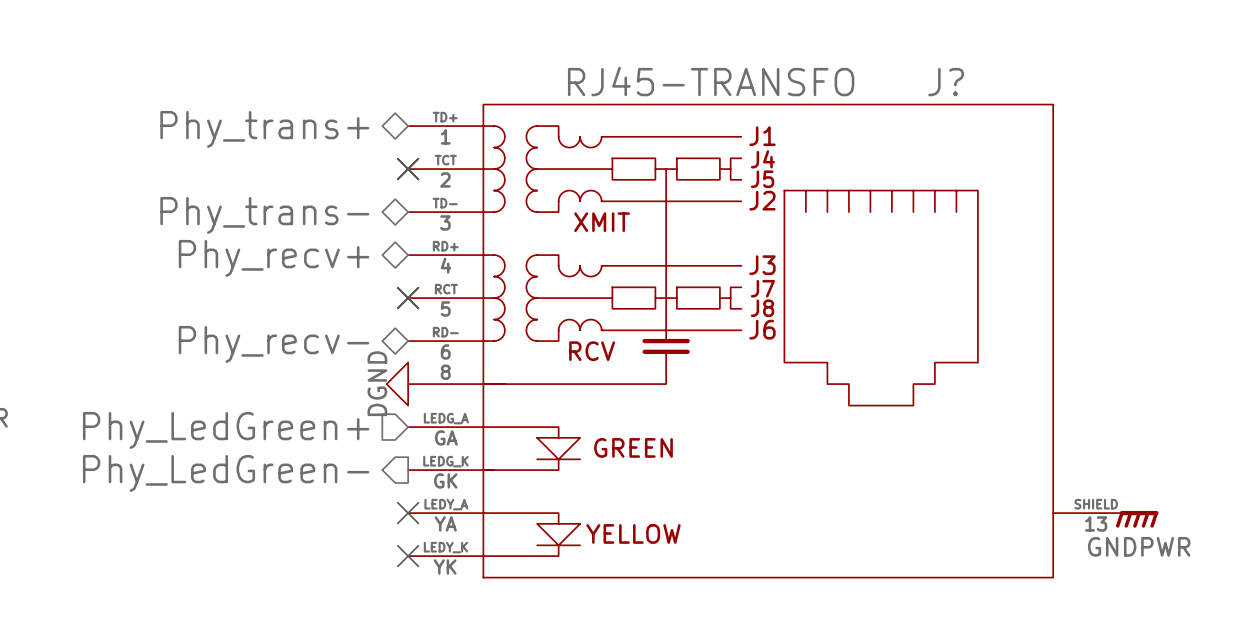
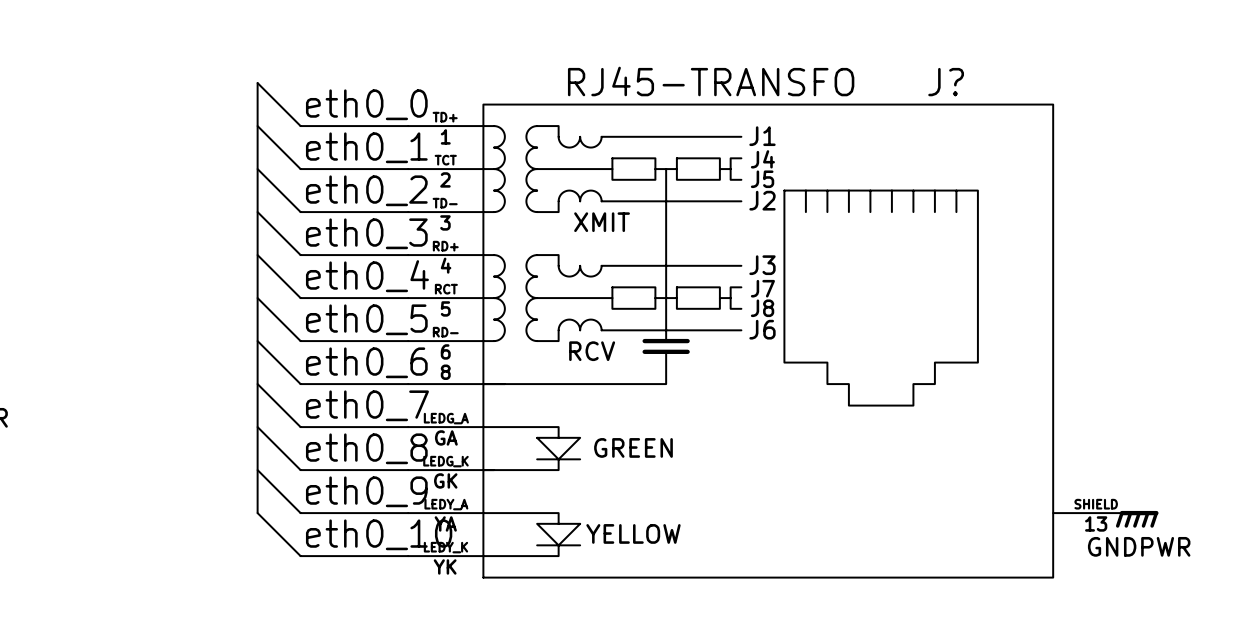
bus: none -> (257, 83) (257, 513)
wire: none -> (257, 83) (300, 126) (408, 126)
label: none -> eth0_0 (366, 104)
wire: none -> (257, 126) (300, 169) (408, 169)
hierarchical label: Phy_trans+ (264, 129) -> none
label: none -> eth0_1 (366, 147)
wire: none -> (257, 169) (300, 212) (408, 212)
no-connect mark: (408, 169) -> none
label: none -> eth0_2 (366, 190)
wire: none -> (257, 212) (300, 255) (408, 255)
hierarchical label: Phy_trans- (264, 215) -> none
label: none -> eth0_3 (366, 233)
wire: none -> (257, 255) (300, 298) (408, 298)
hierarchical label: Phy_recv+ (274, 258) -> none
label: none -> eth0_4 (367, 276)
wire: none -> (257, 298) (300, 341) (408, 341)
no-connect mark: (408, 298) -> none
label: none -> eth0_5 (366, 319)
wire: none -> (257, 341) (300, 384) (408, 384)
hierarchical label: Phy_recv- (274, 344) -> none
label: none -> eth0_6 (366, 362)
wire: none -> (257, 384) (300, 427) (408, 427)
power symbol: DGND (397, 384) -> none
label: none -> eth0_7 (367, 405)
wire: none -> (257, 427) (300, 470) (408, 470)
hierarchical label: Phy_LedGreen+ (226, 430) -> none
label: none -> eth0_8 (366, 448)
wire: none -> (257, 470) (300, 513) (408, 513)
hierarchical label: Phy_LedGreen- (226, 473) -> none
label: none -> eth0_9 (366, 491)
wire: none -> (257, 513) (300, 556) (408, 556)
no-connect mark: (408, 513) -> none
label: none -> eth0_10 (379, 534)
no-connect mark: (408, 556) -> none

